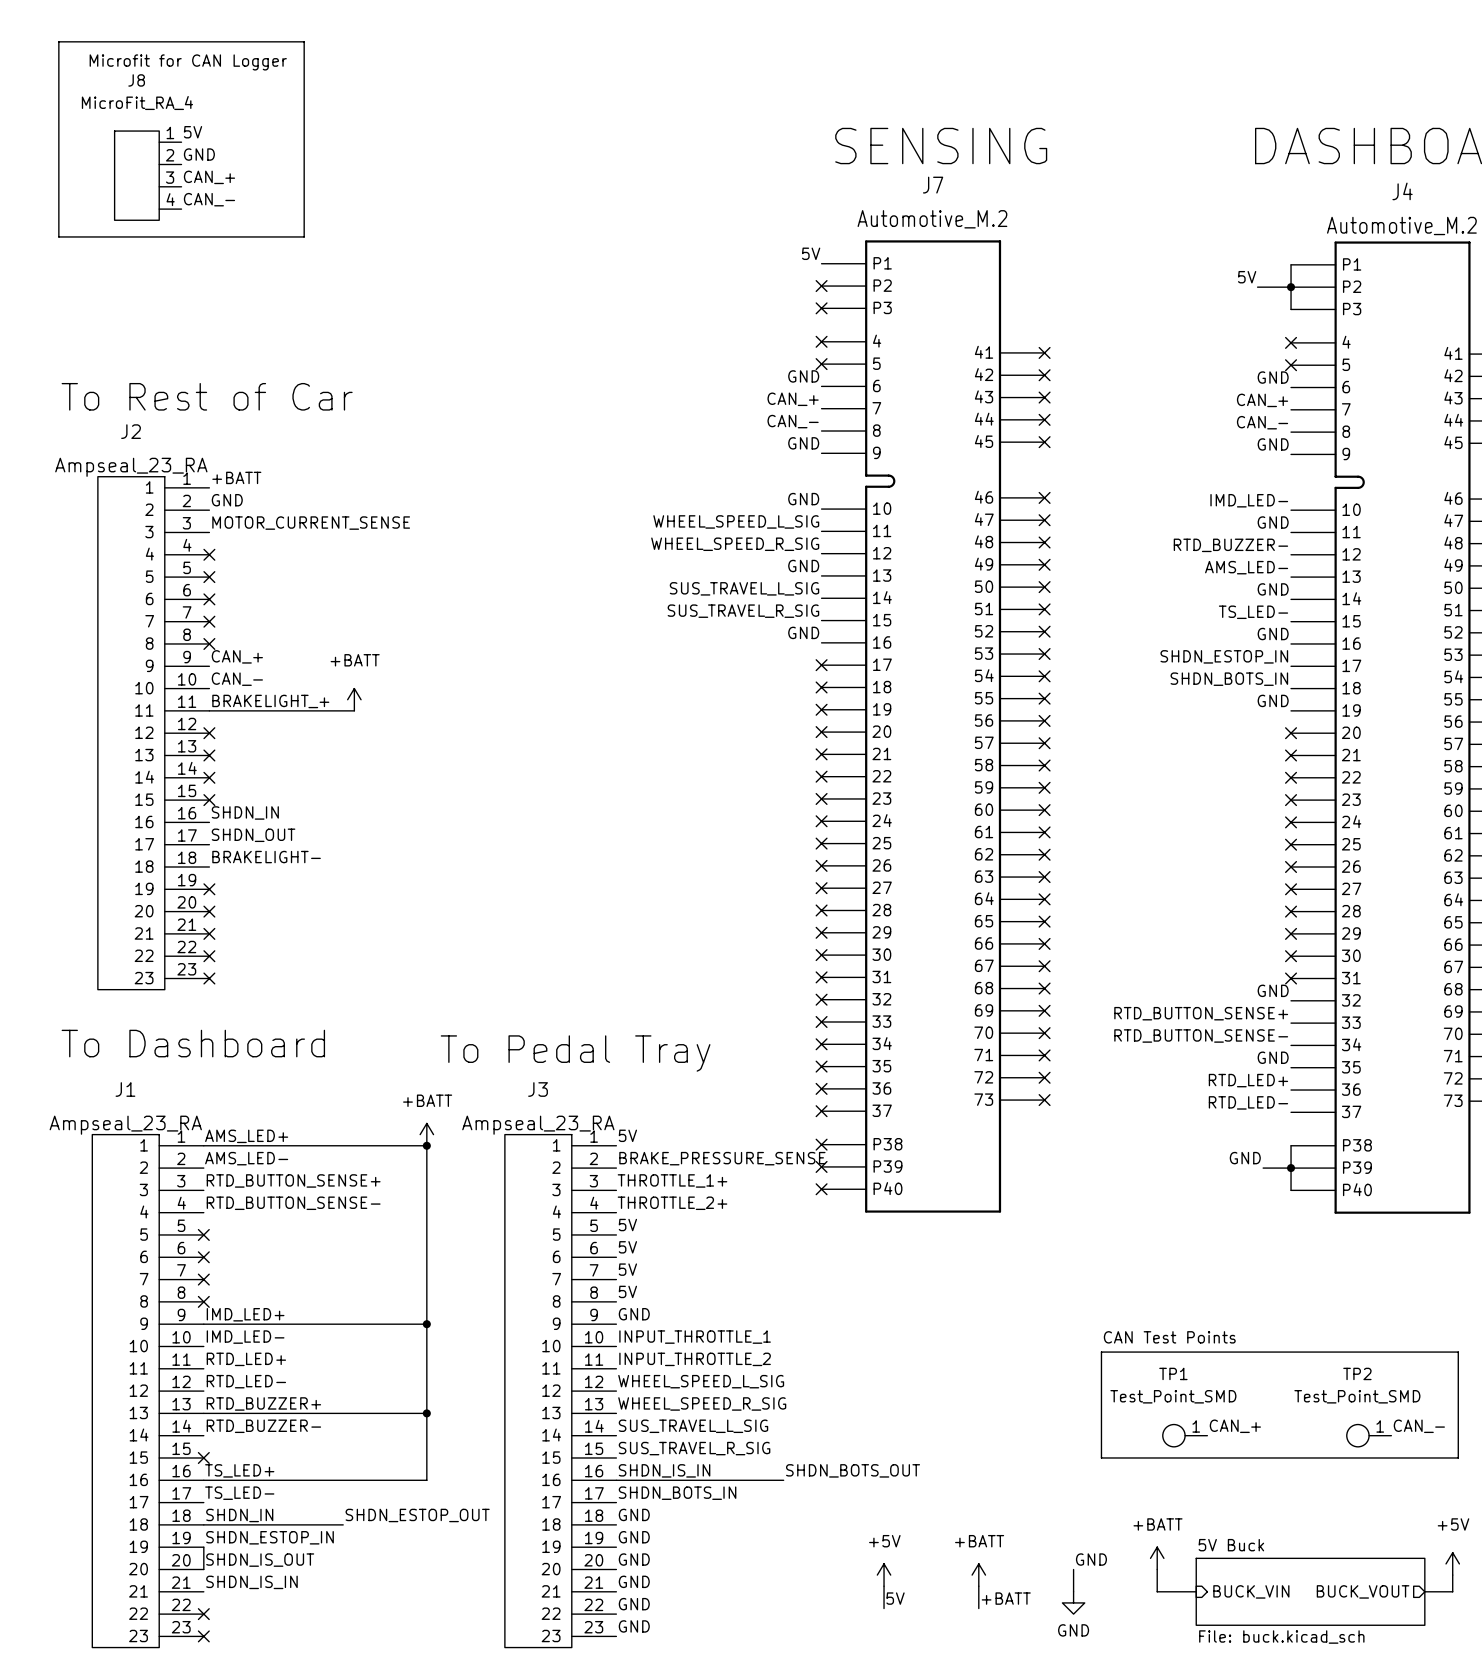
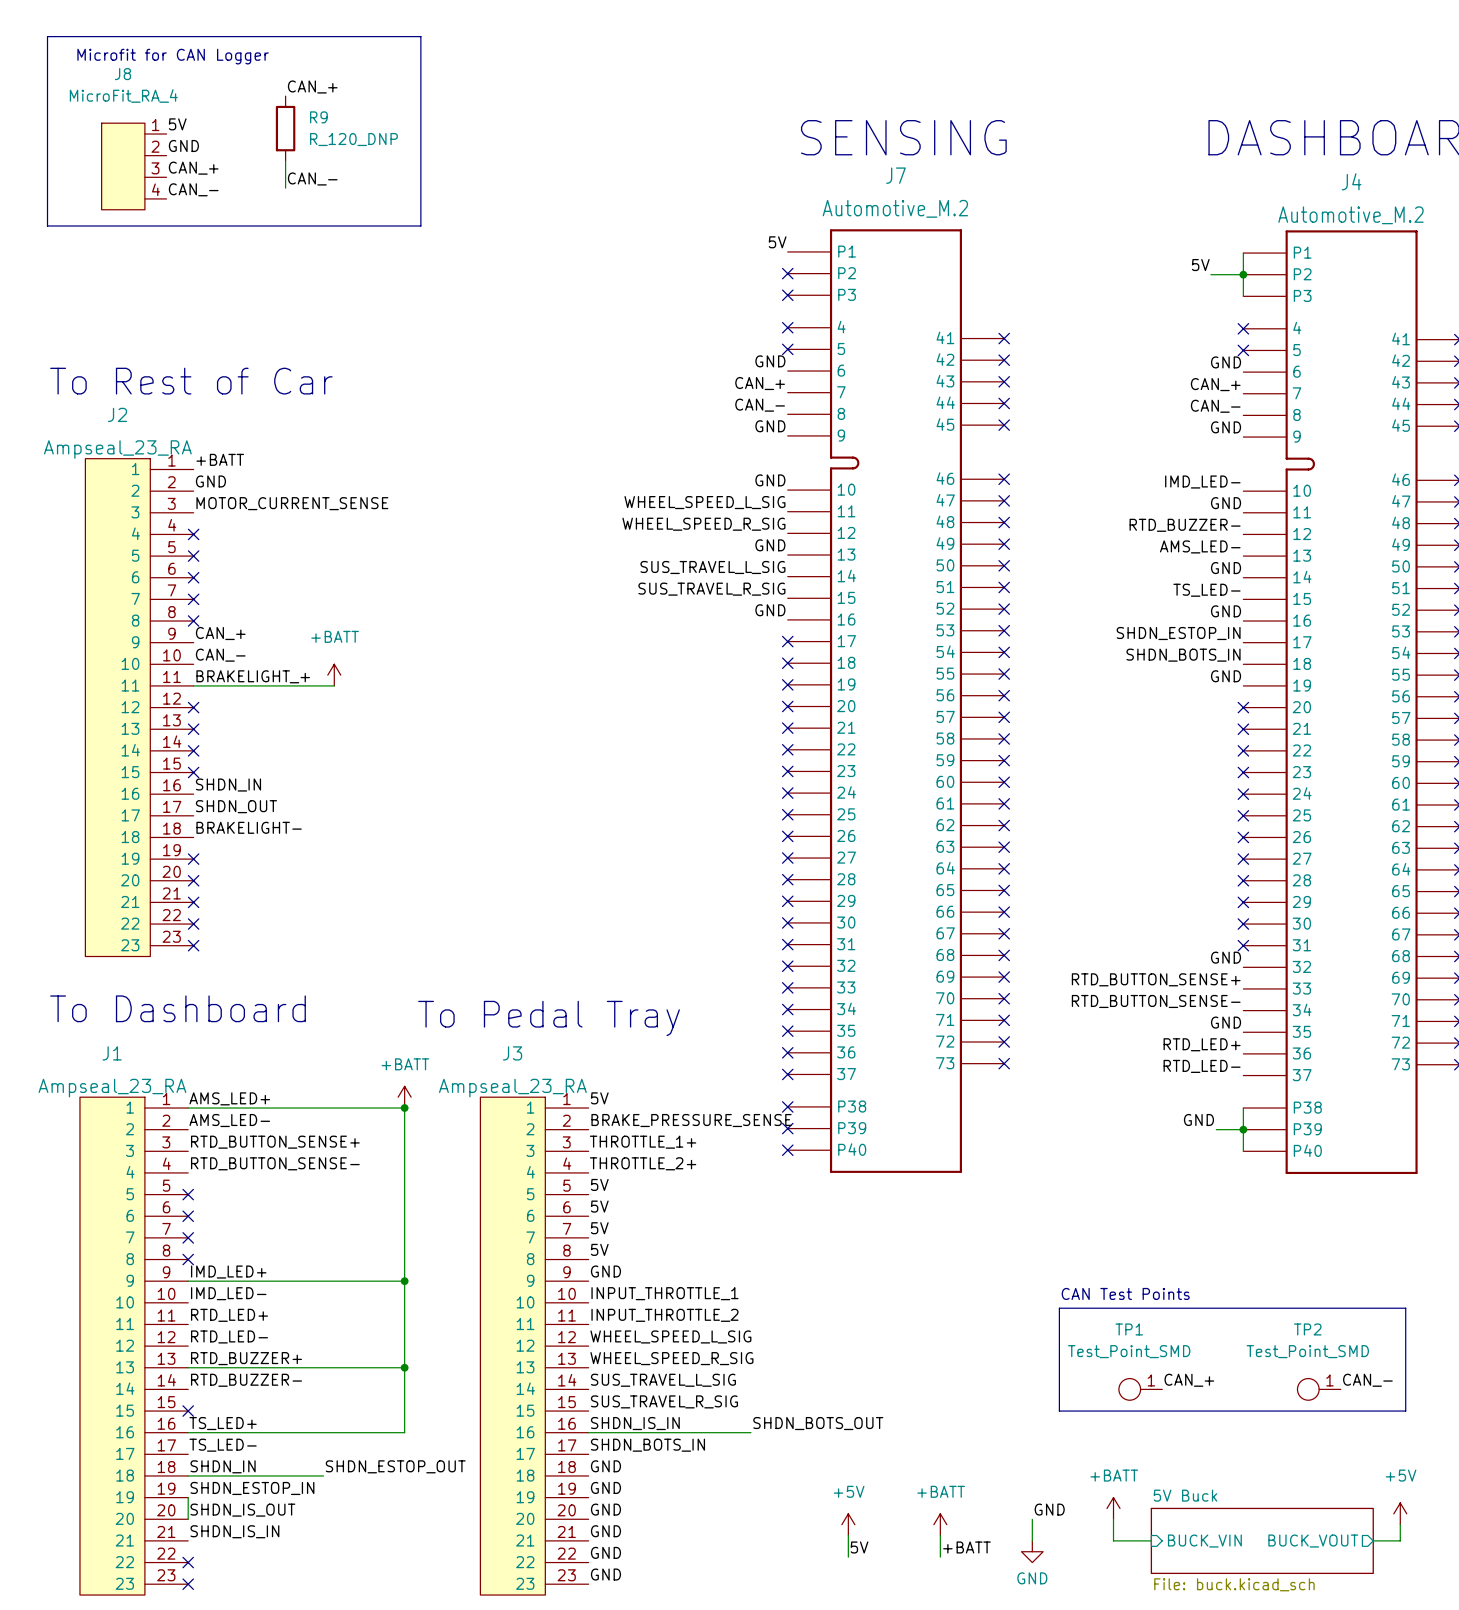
line: (304, 41) (304, 236) -> (285, 36) (420, 36) (420, 225) (285, 225)
label: none -> CAN_+ (312, 86)
R9: none -> R_120_DNP (285, 128)
label: none -> CAN_- (312, 178)

